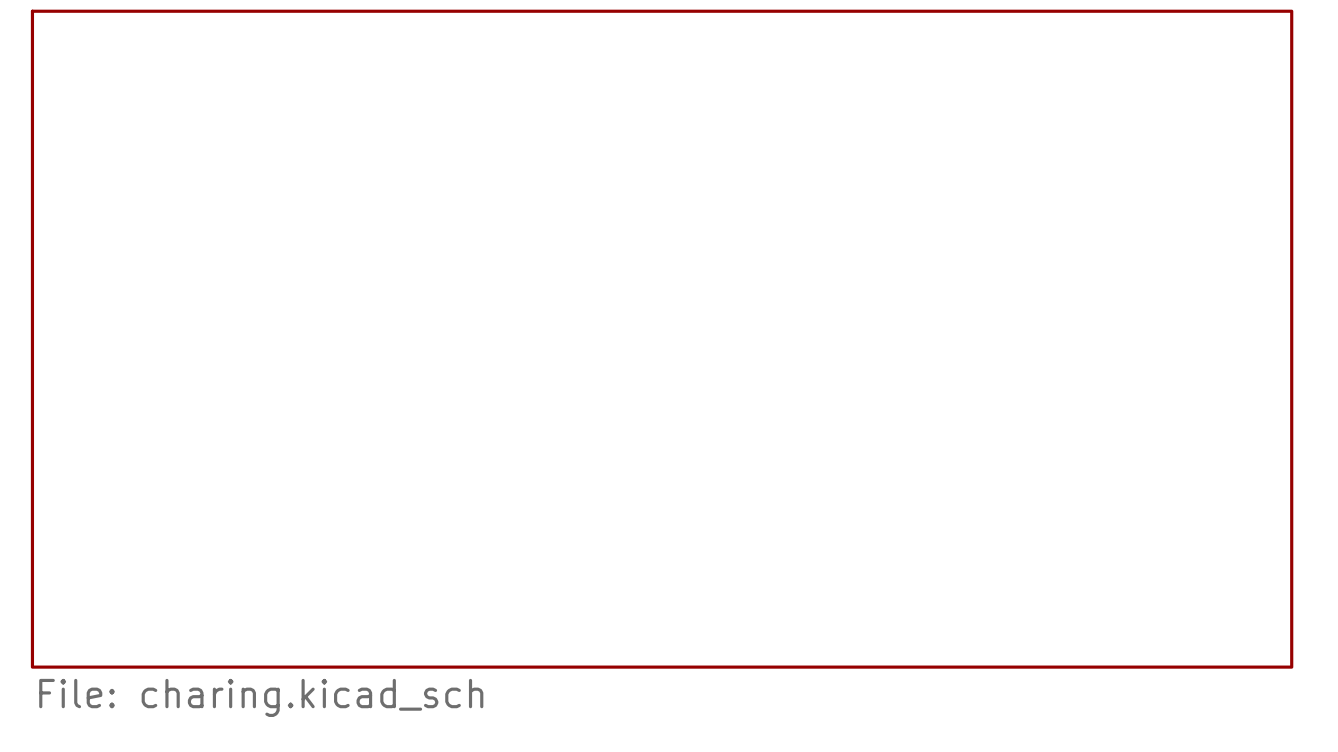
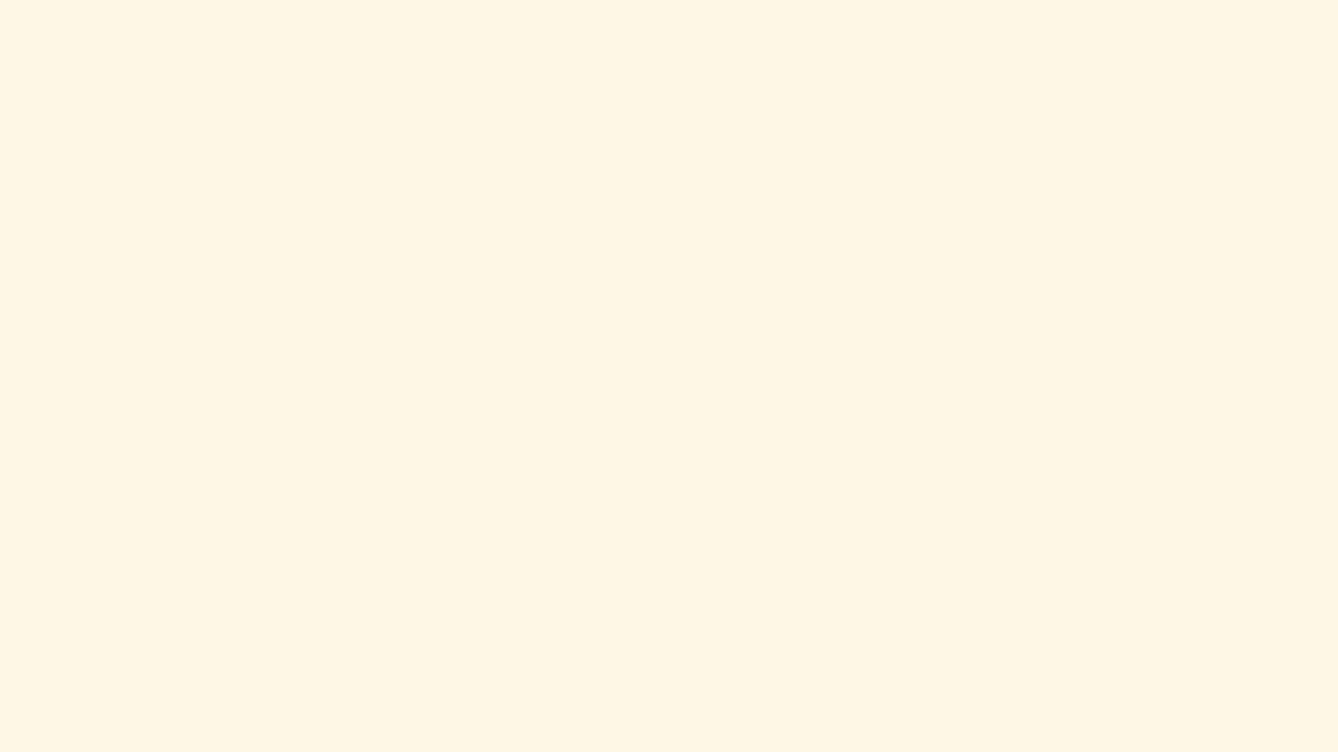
sheet: File: charing.kicad_sch (662, 339) -> none

